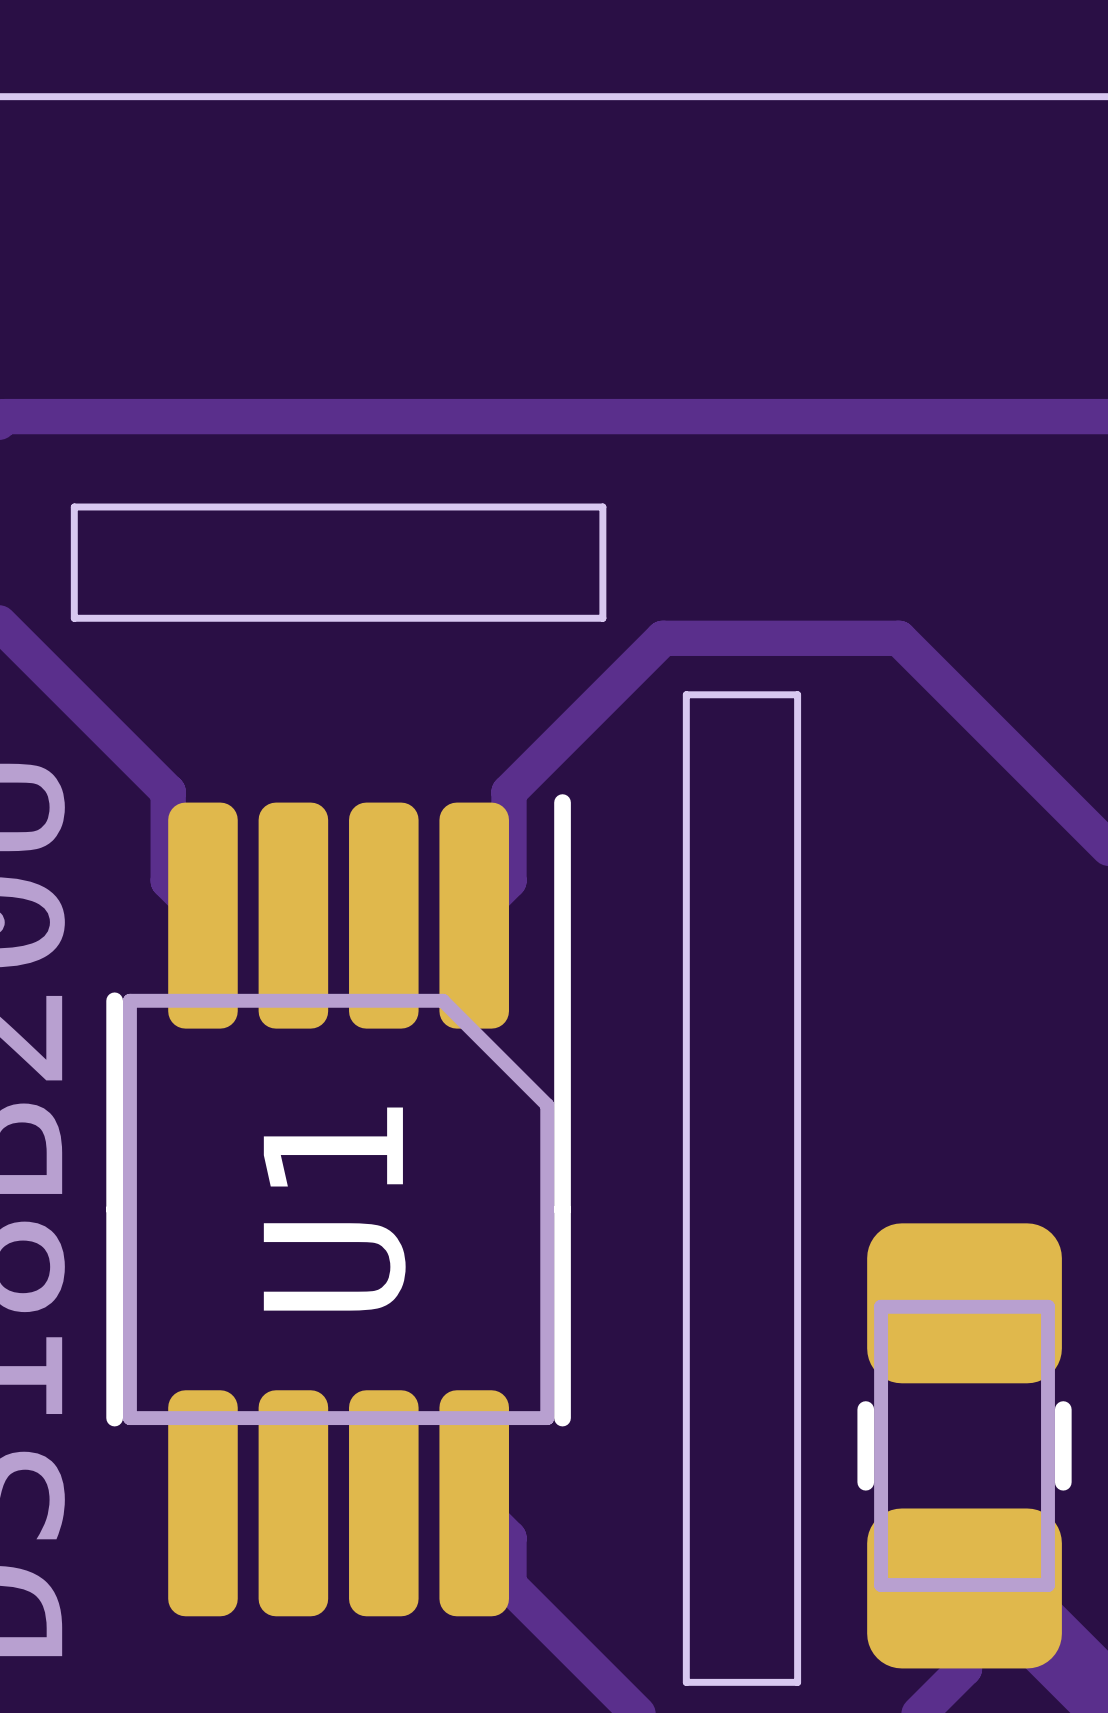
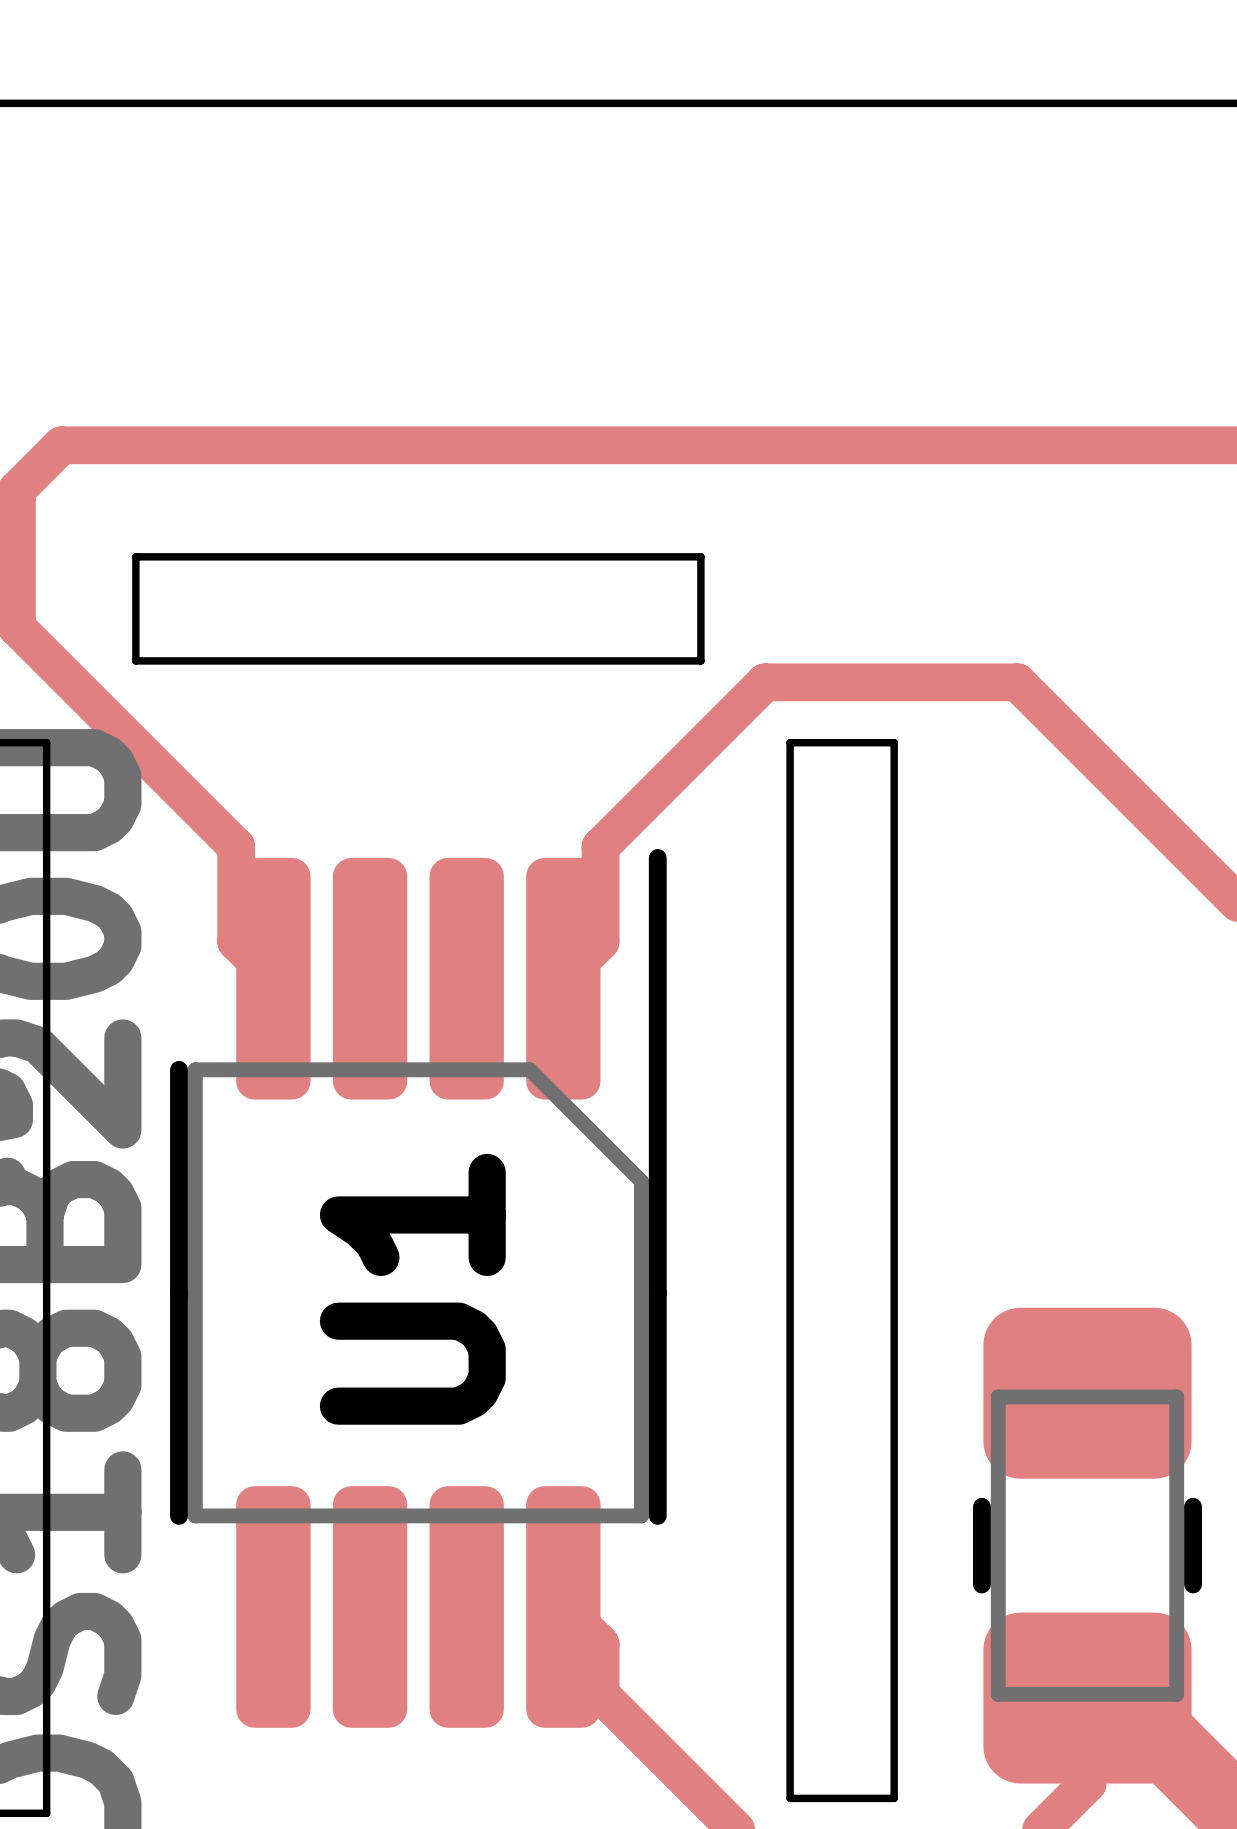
board edge: (74, 520) (74, 506) (602, 506) (602, 520) -> (135, 556) (700, 556)
board edge: (783, 694) (797, 694) (797, 1682) (783, 1682) -> (894, 742) (894, 1798)

